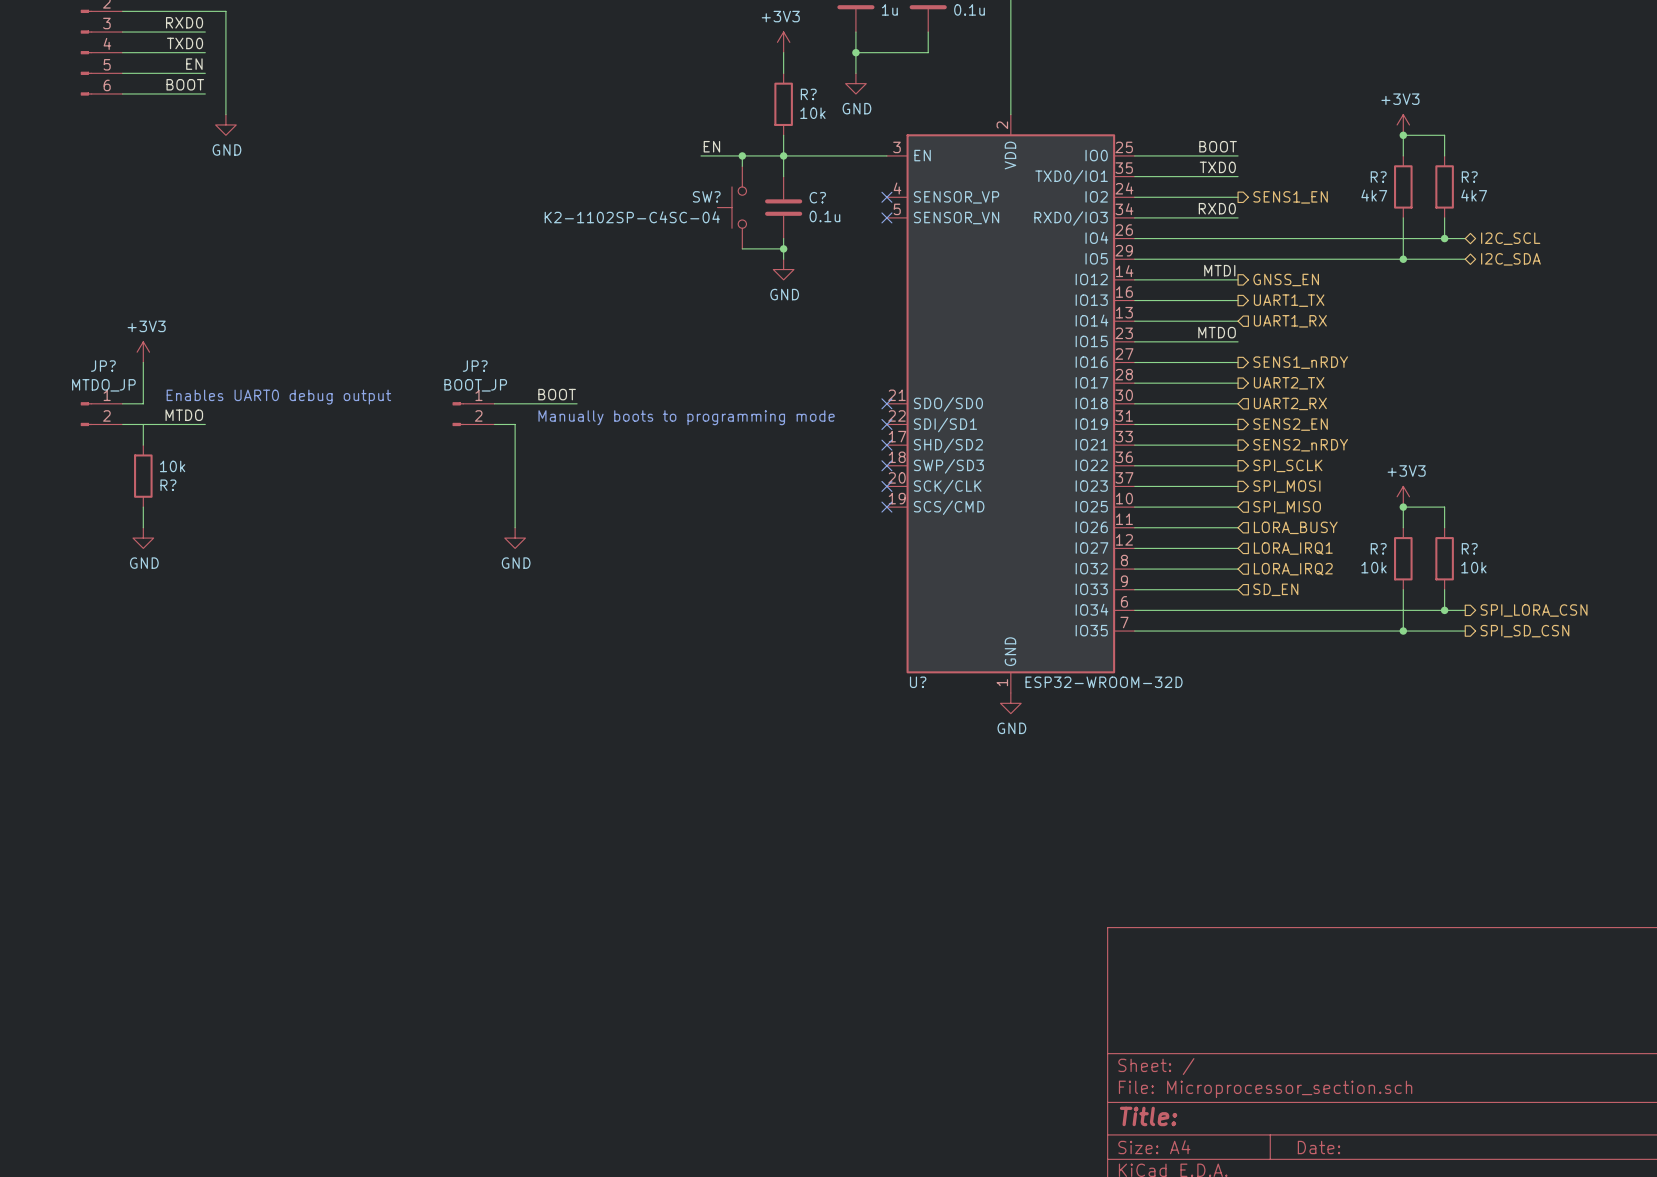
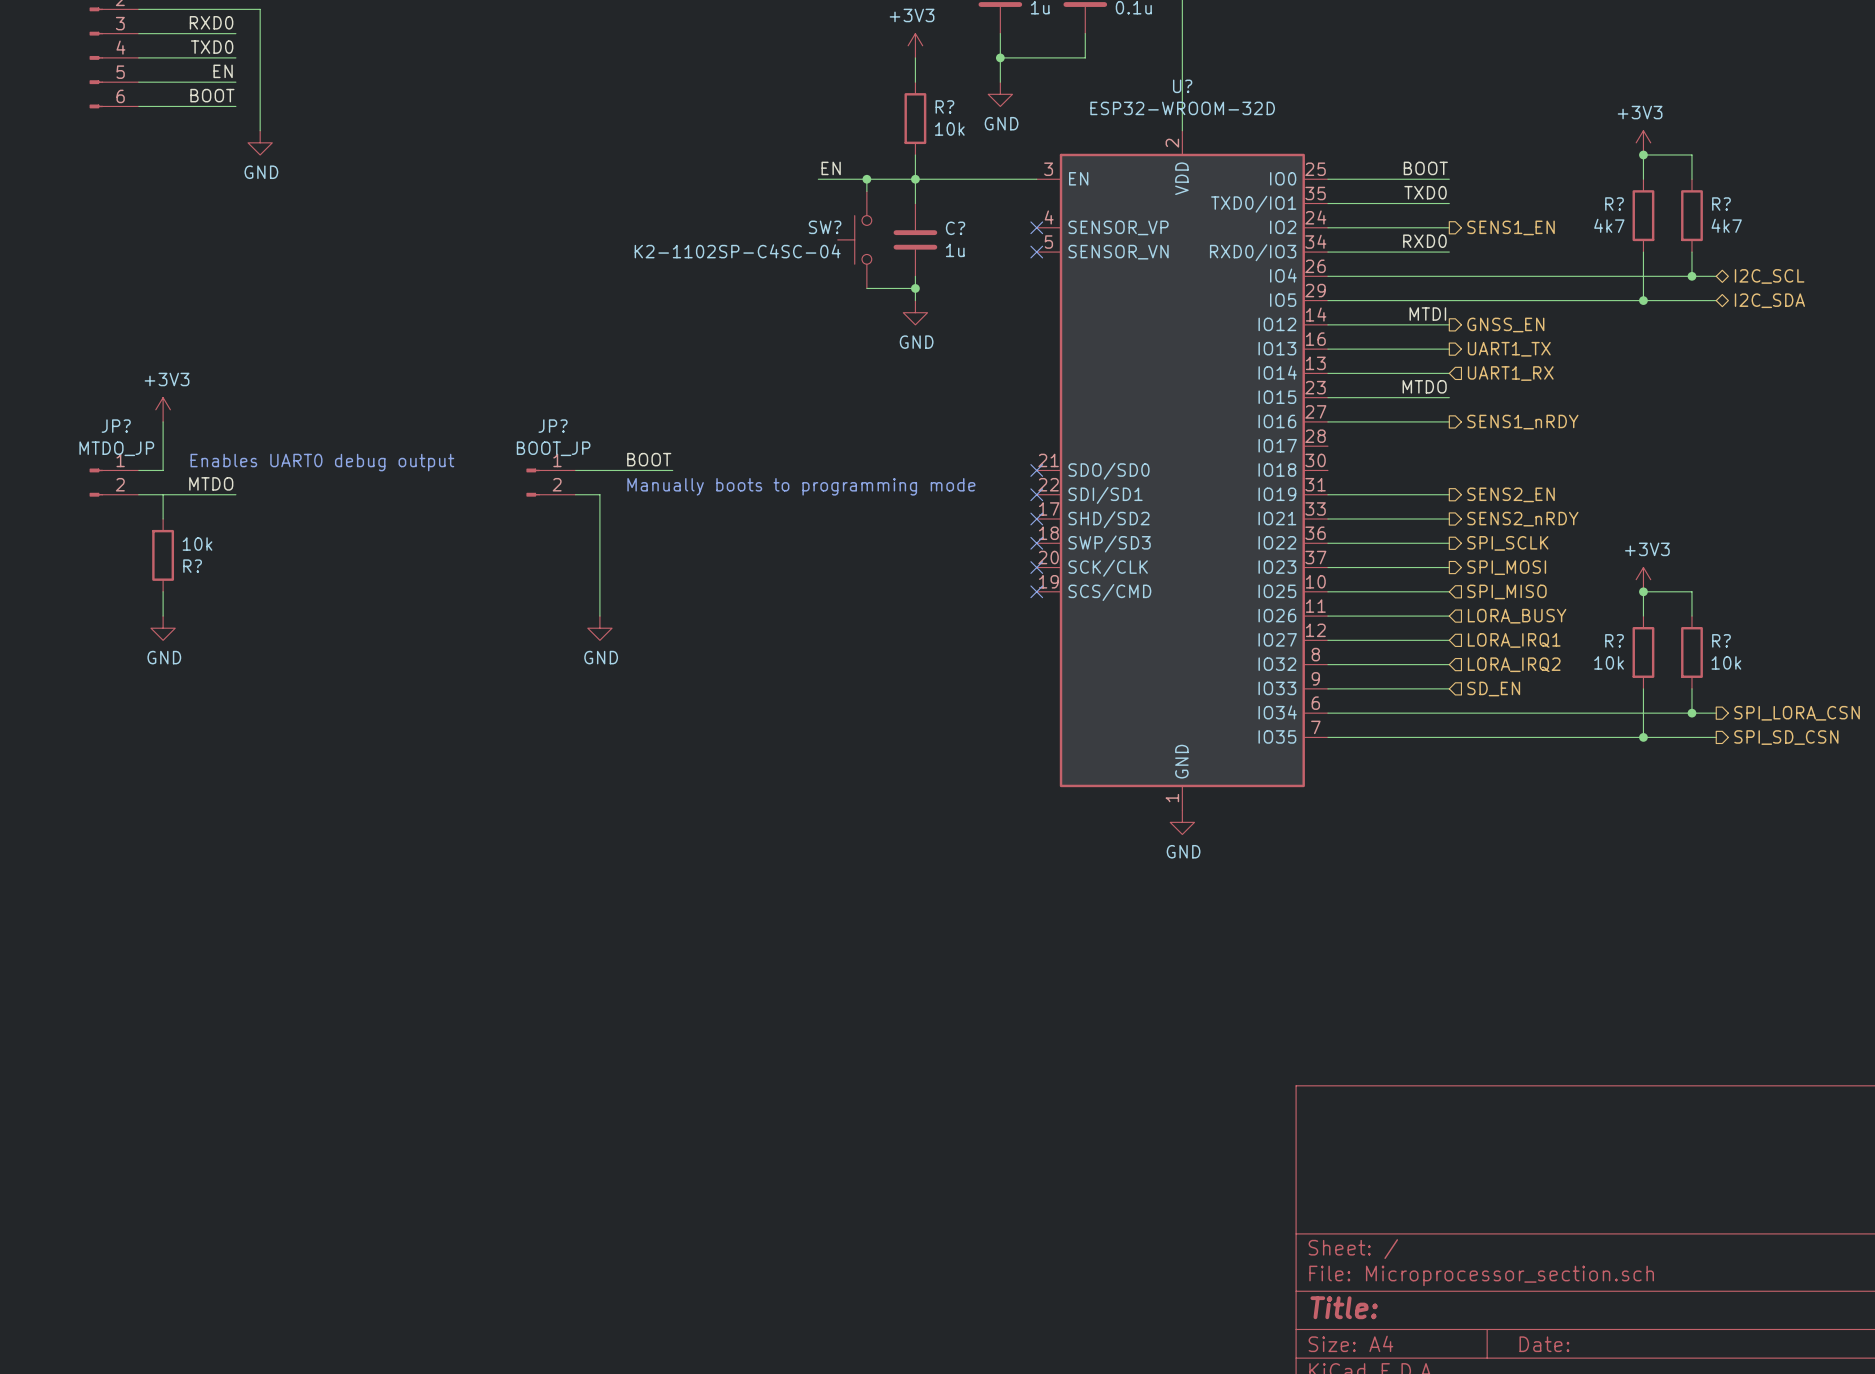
C? value: 0.1u (824, 216) -> 1u (955, 250)
wire: (1134, 383) (1238, 383) -> none
hierarchical label: UART2_TX (1289, 383) -> none
wire: (1134, 403) (1238, 403) -> none
hierarchical label: UART2_RX (1290, 403) -> none
U? name position: U? (918, 682) -> U? (1182, 86)
U? value position: ESP32-WROOM-32D (1104, 682) -> ESP32-WROOM-32D (1182, 108)

